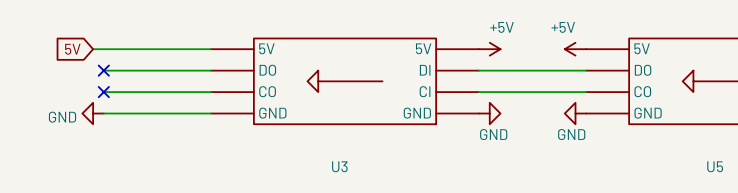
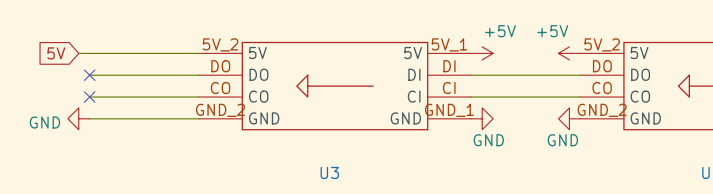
U3 pin number: none -> 5V_2 (220, 44)
U3 pin number: none -> 5V_1 (449, 44)
U5 pin number: none -> 5V_2 (602, 44)
U3 pin number: none -> DO (220, 66)
U3 pin number: none -> DI (449, 66)
U5 pin number: none -> DO (602, 66)
U3 pin number: none -> CO (220, 88)
U3 pin number: none -> CI (449, 88)
U5 pin number: none -> CO (602, 88)
U3 pin number: none -> GND_2 (220, 110)
U3 pin number: none -> GND_1 (449, 110)
U5 pin number: none -> GND_2 (602, 110)

